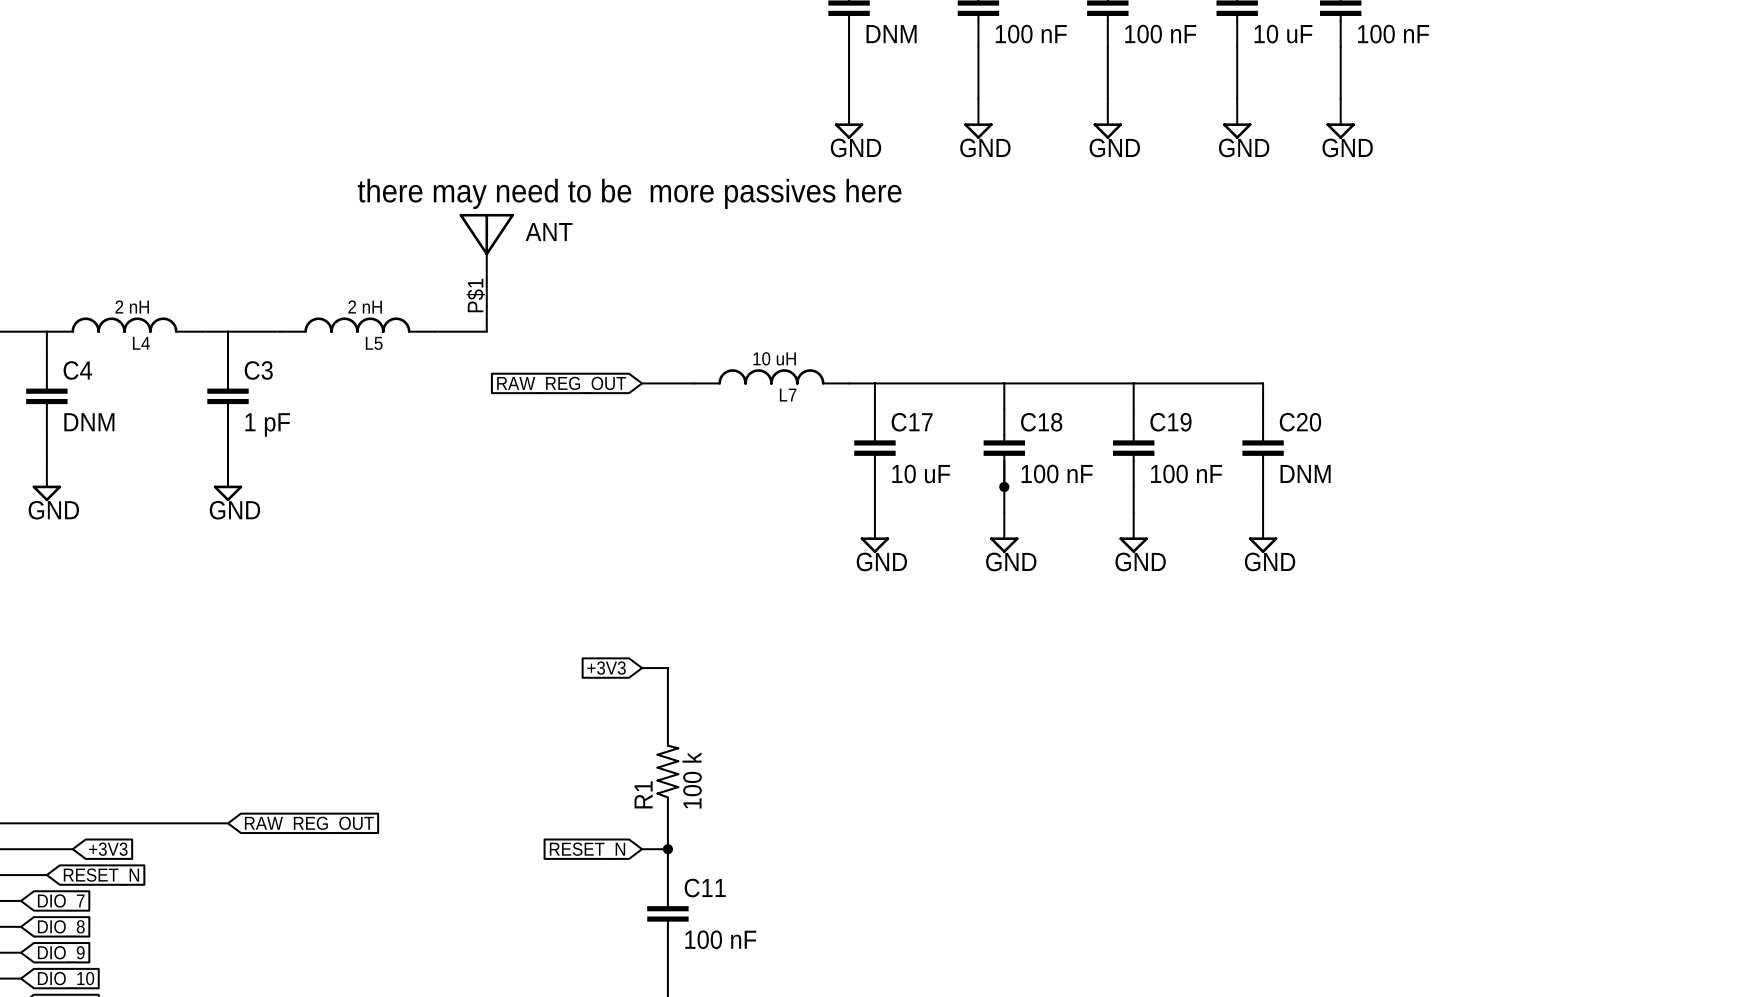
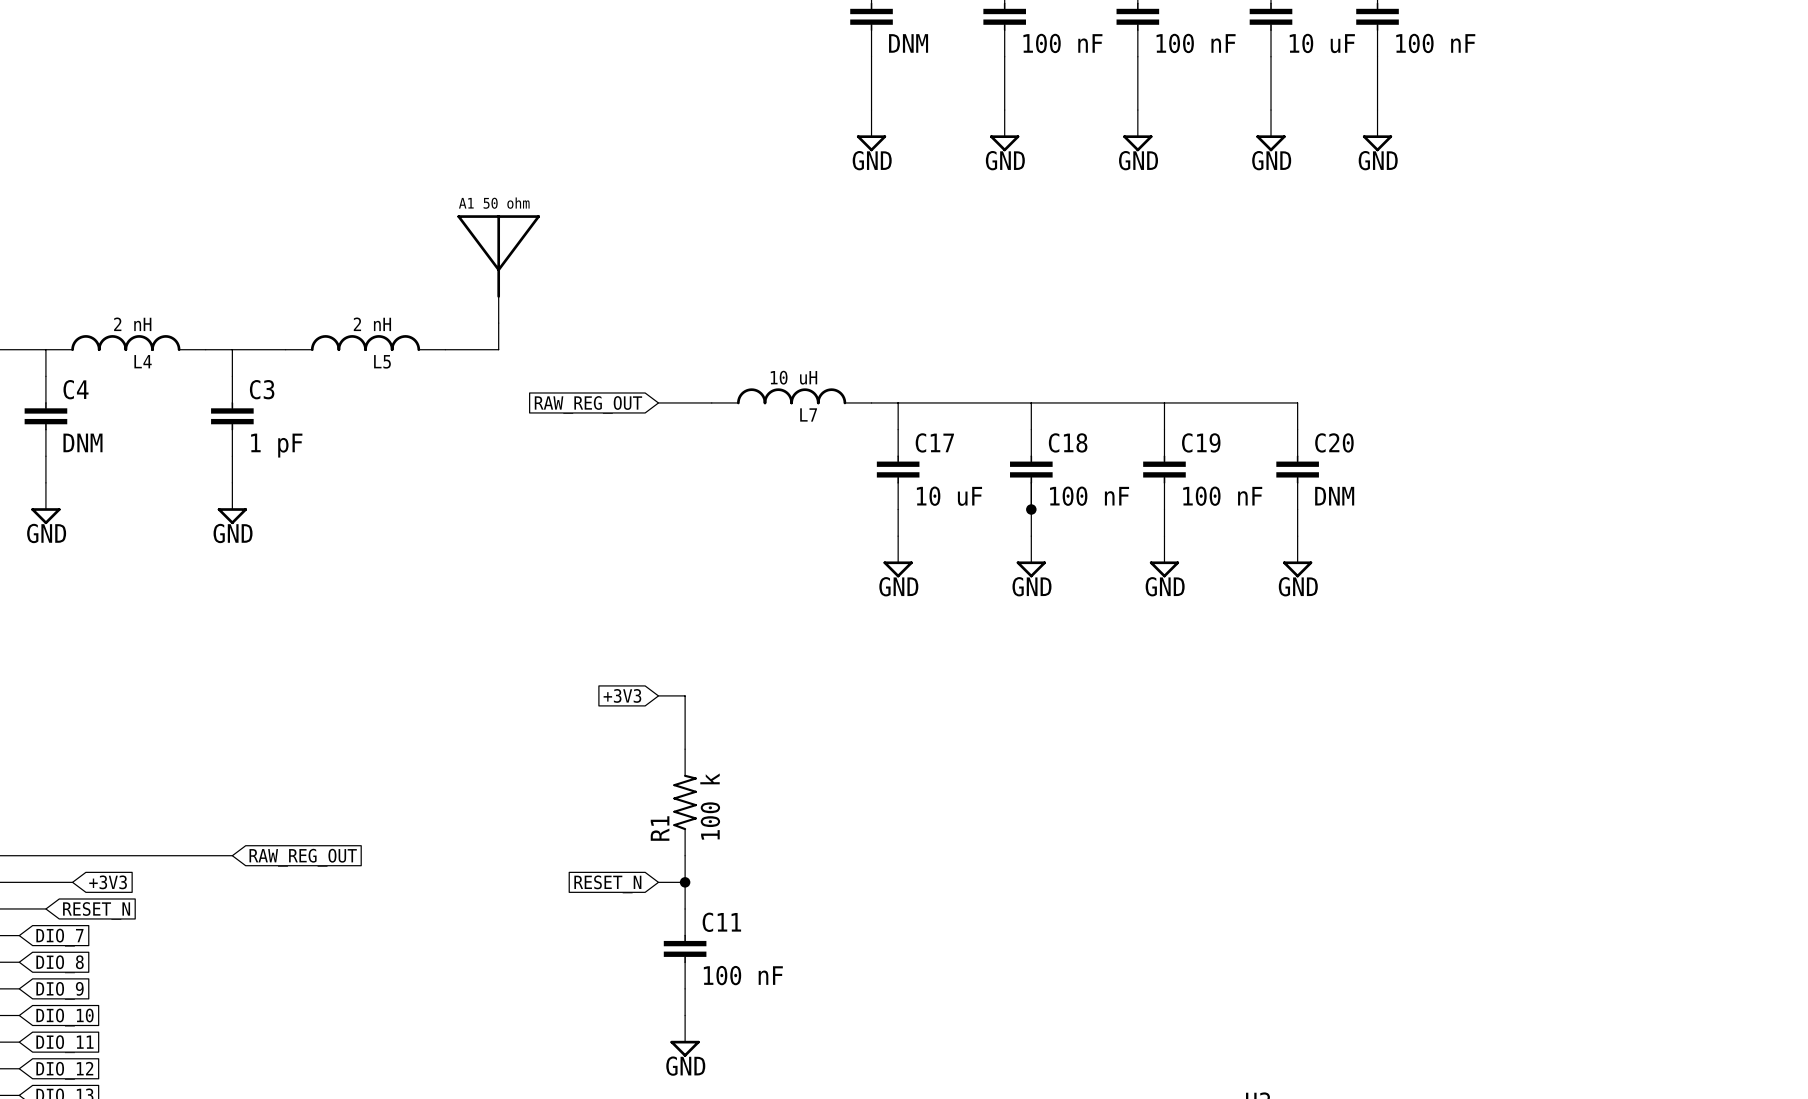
text: there may need to be more passives here (629, 193) -> none
A1: none -> 50 ohm (498, 269)
ANT: (486, 259) -> none

